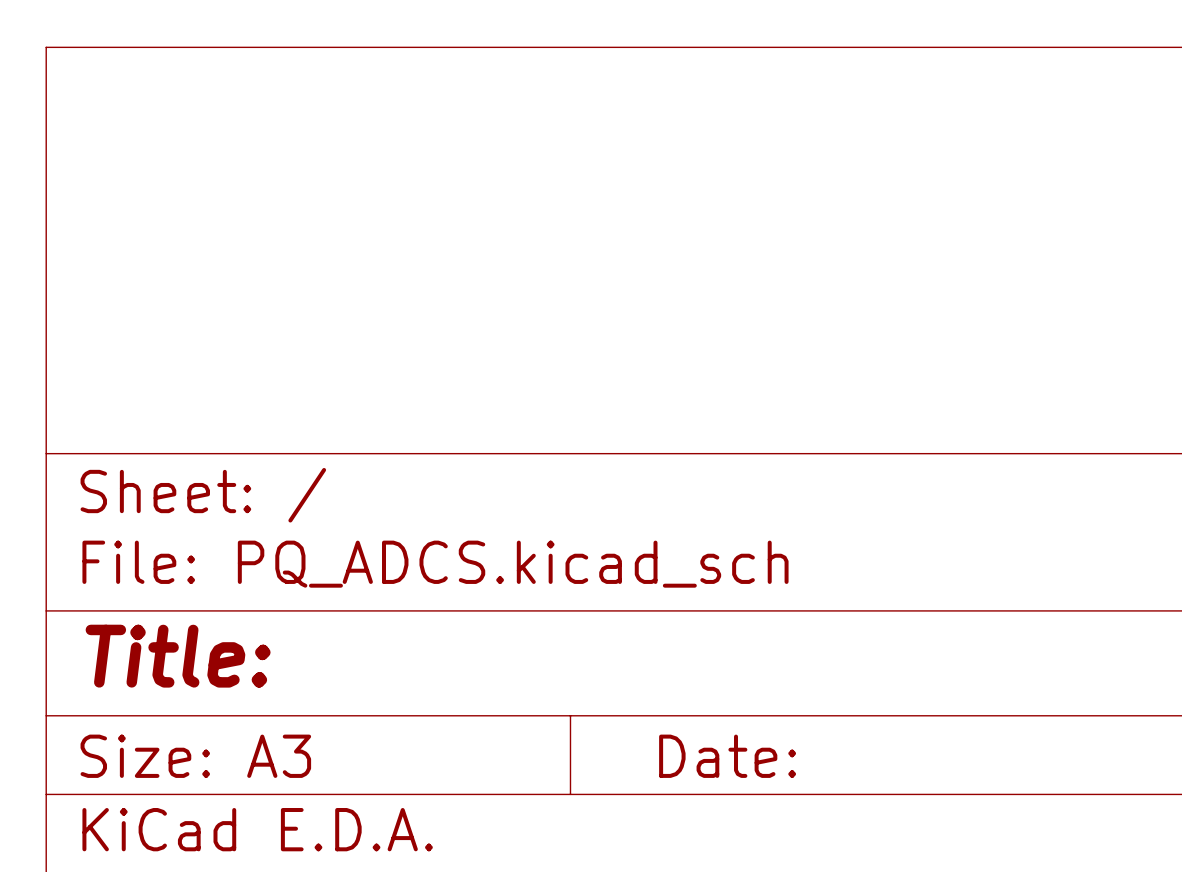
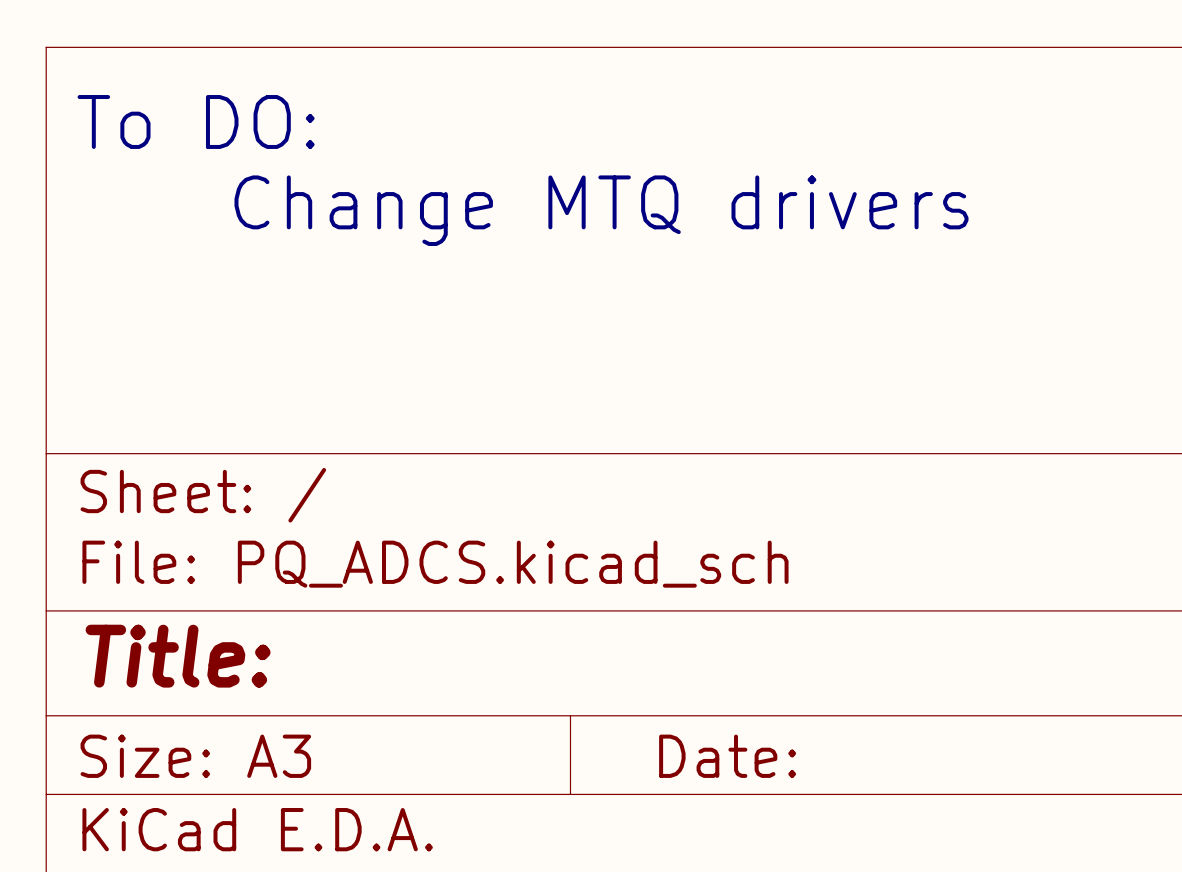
text: none -> To DO: (196, 121)
text: none -> Change MTQ drivers (601, 210)

